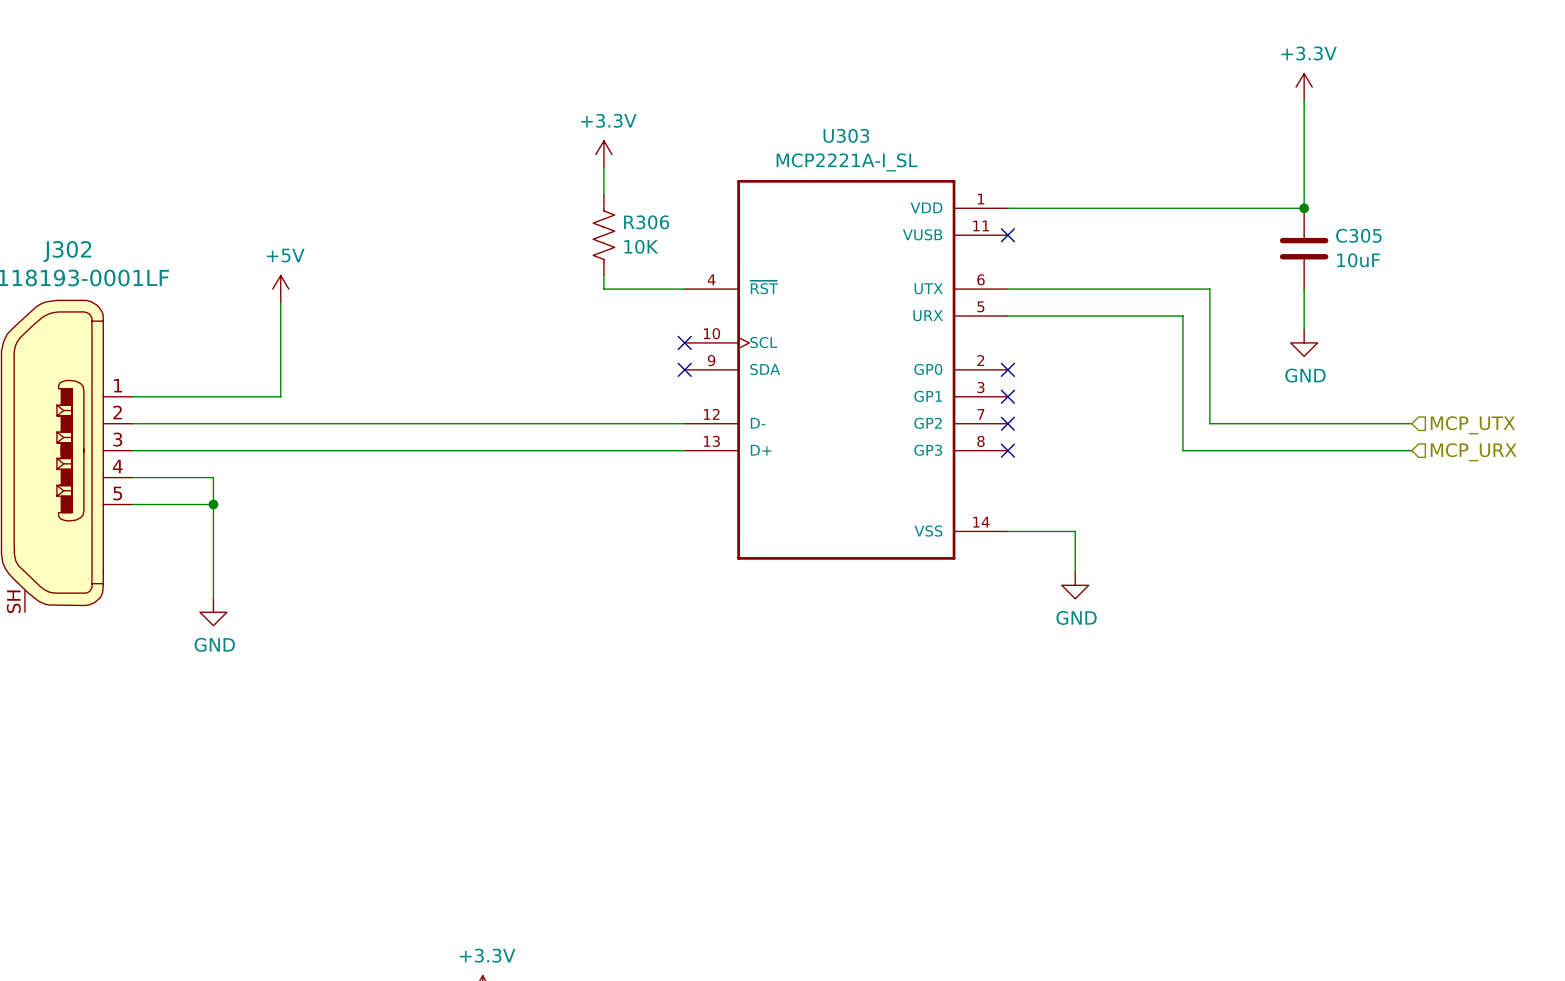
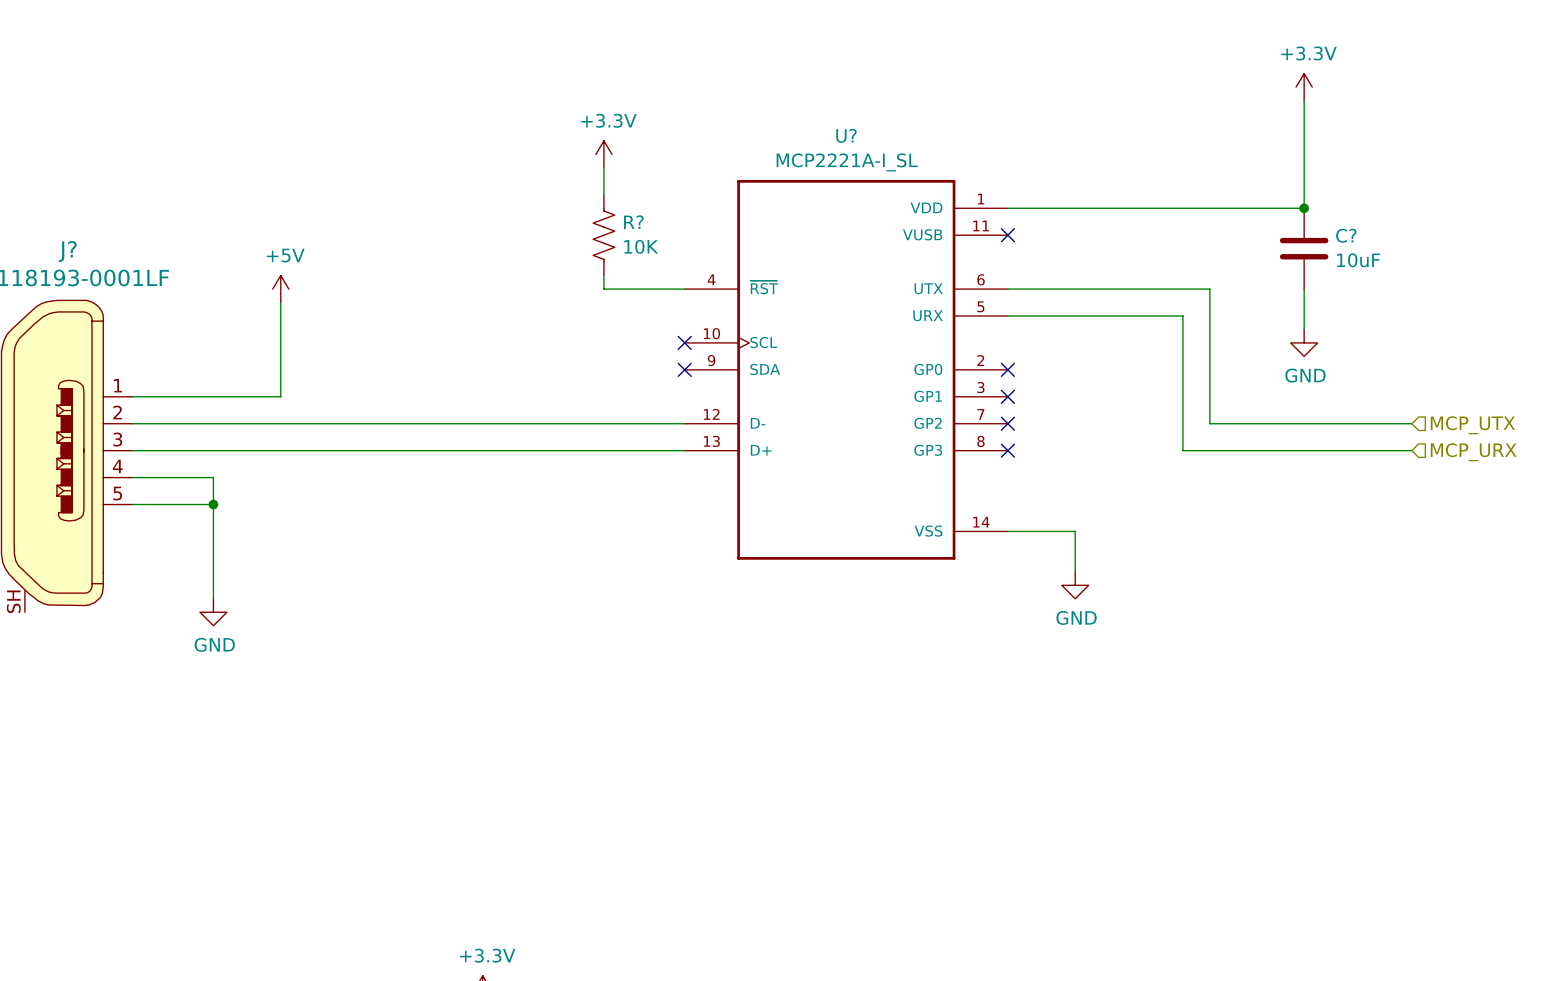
U303 name: U303 (846, 135) -> U? (846, 135)
R306 name: R306 (646, 222) -> R? (633, 222)
C305 name: C305 (1358, 235) -> C? (1346, 235)
J302 name: J302 (67, 251) -> J? (67, 251)

